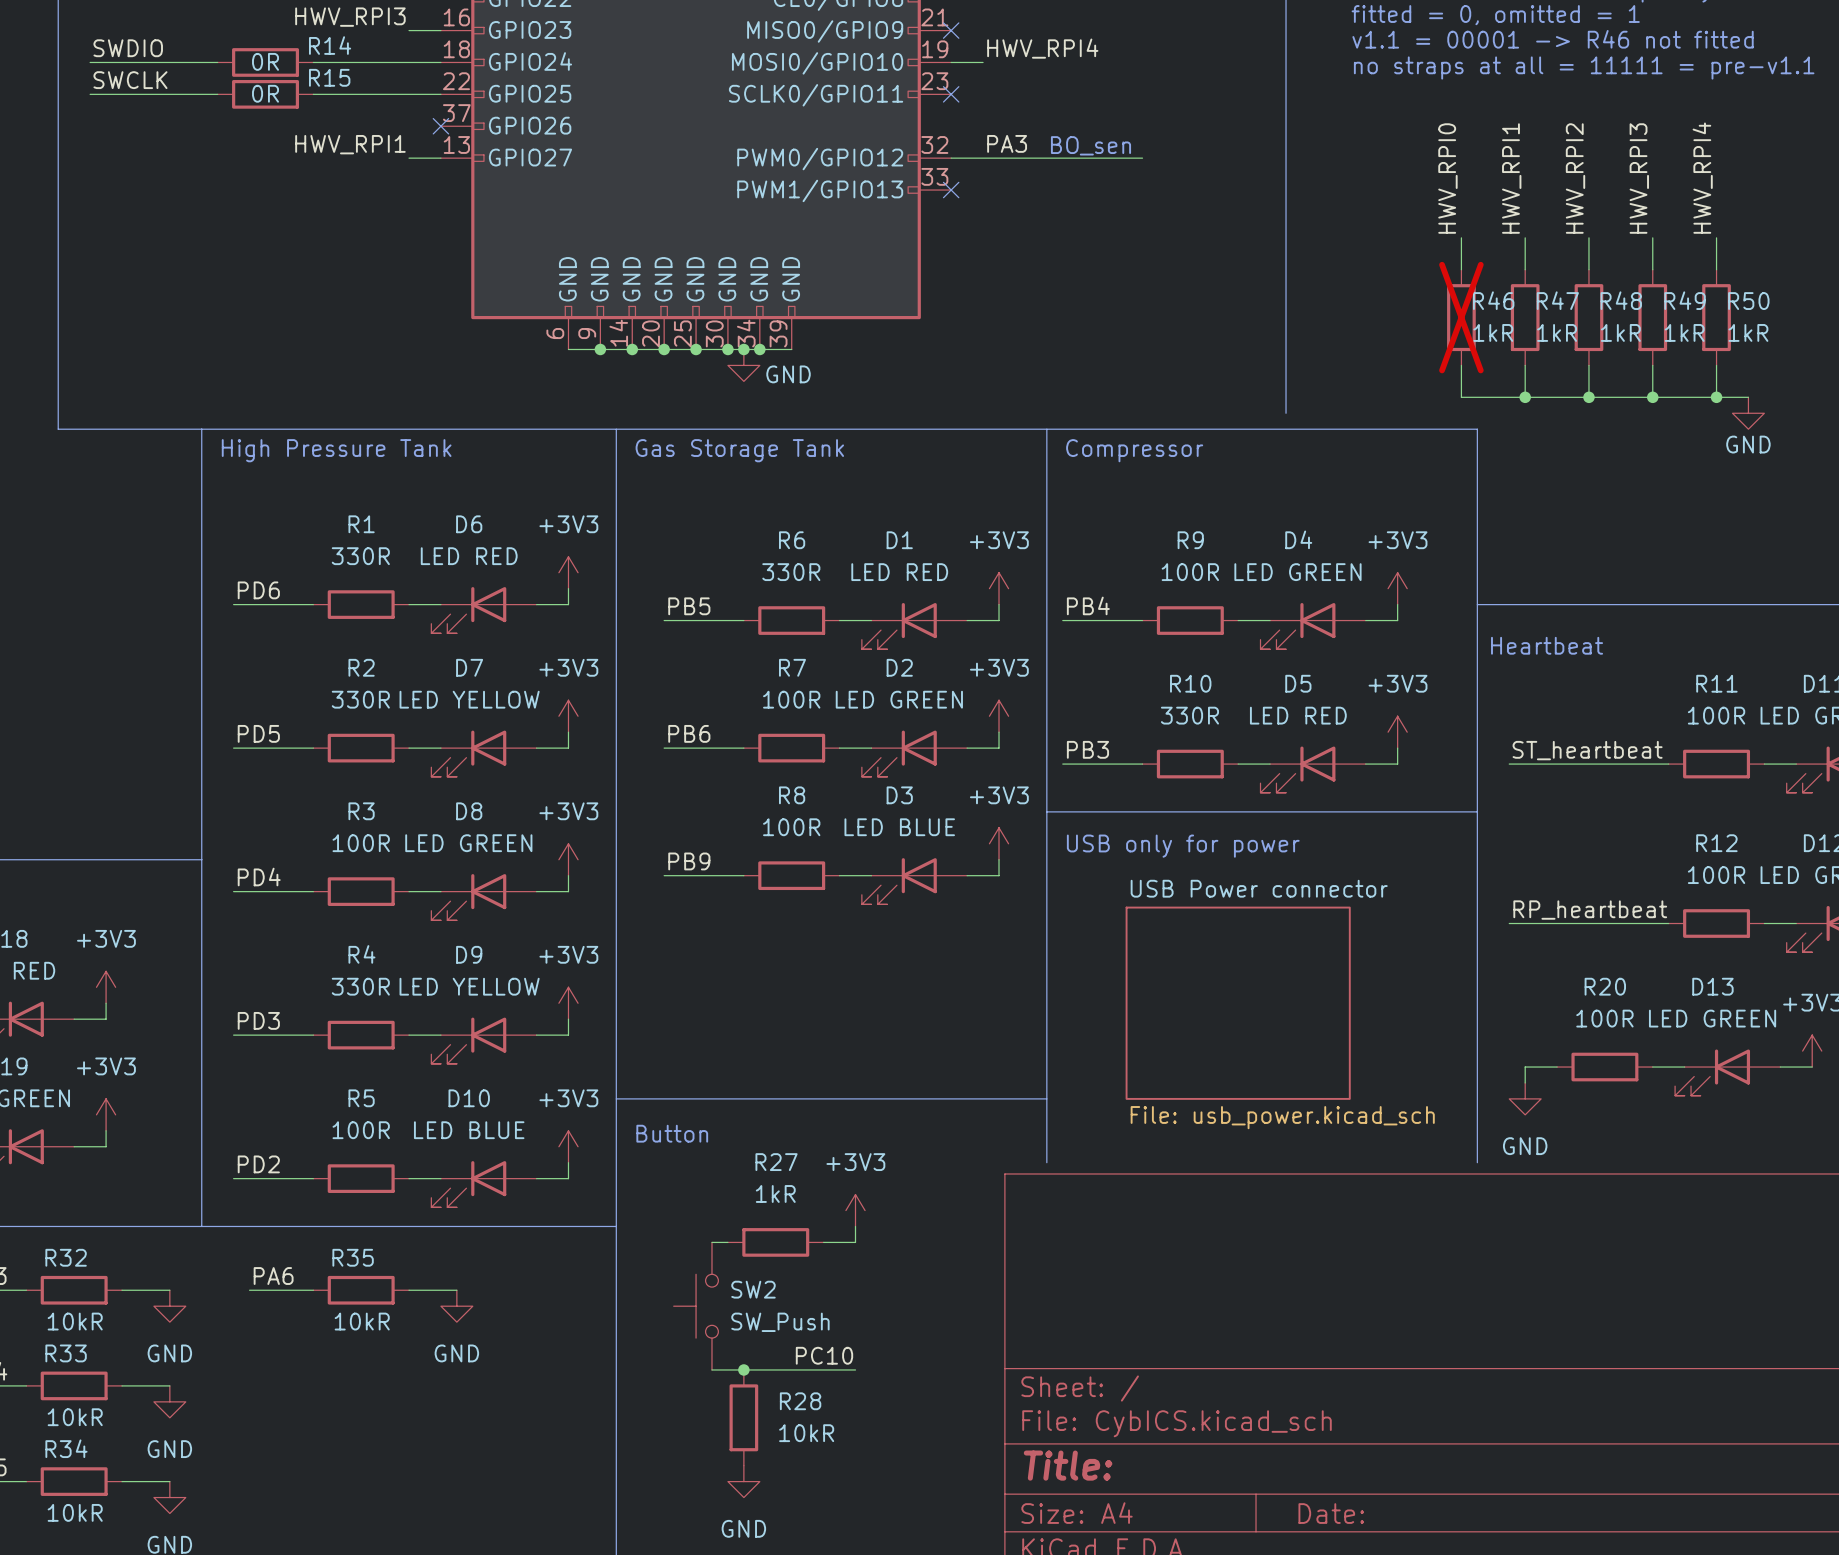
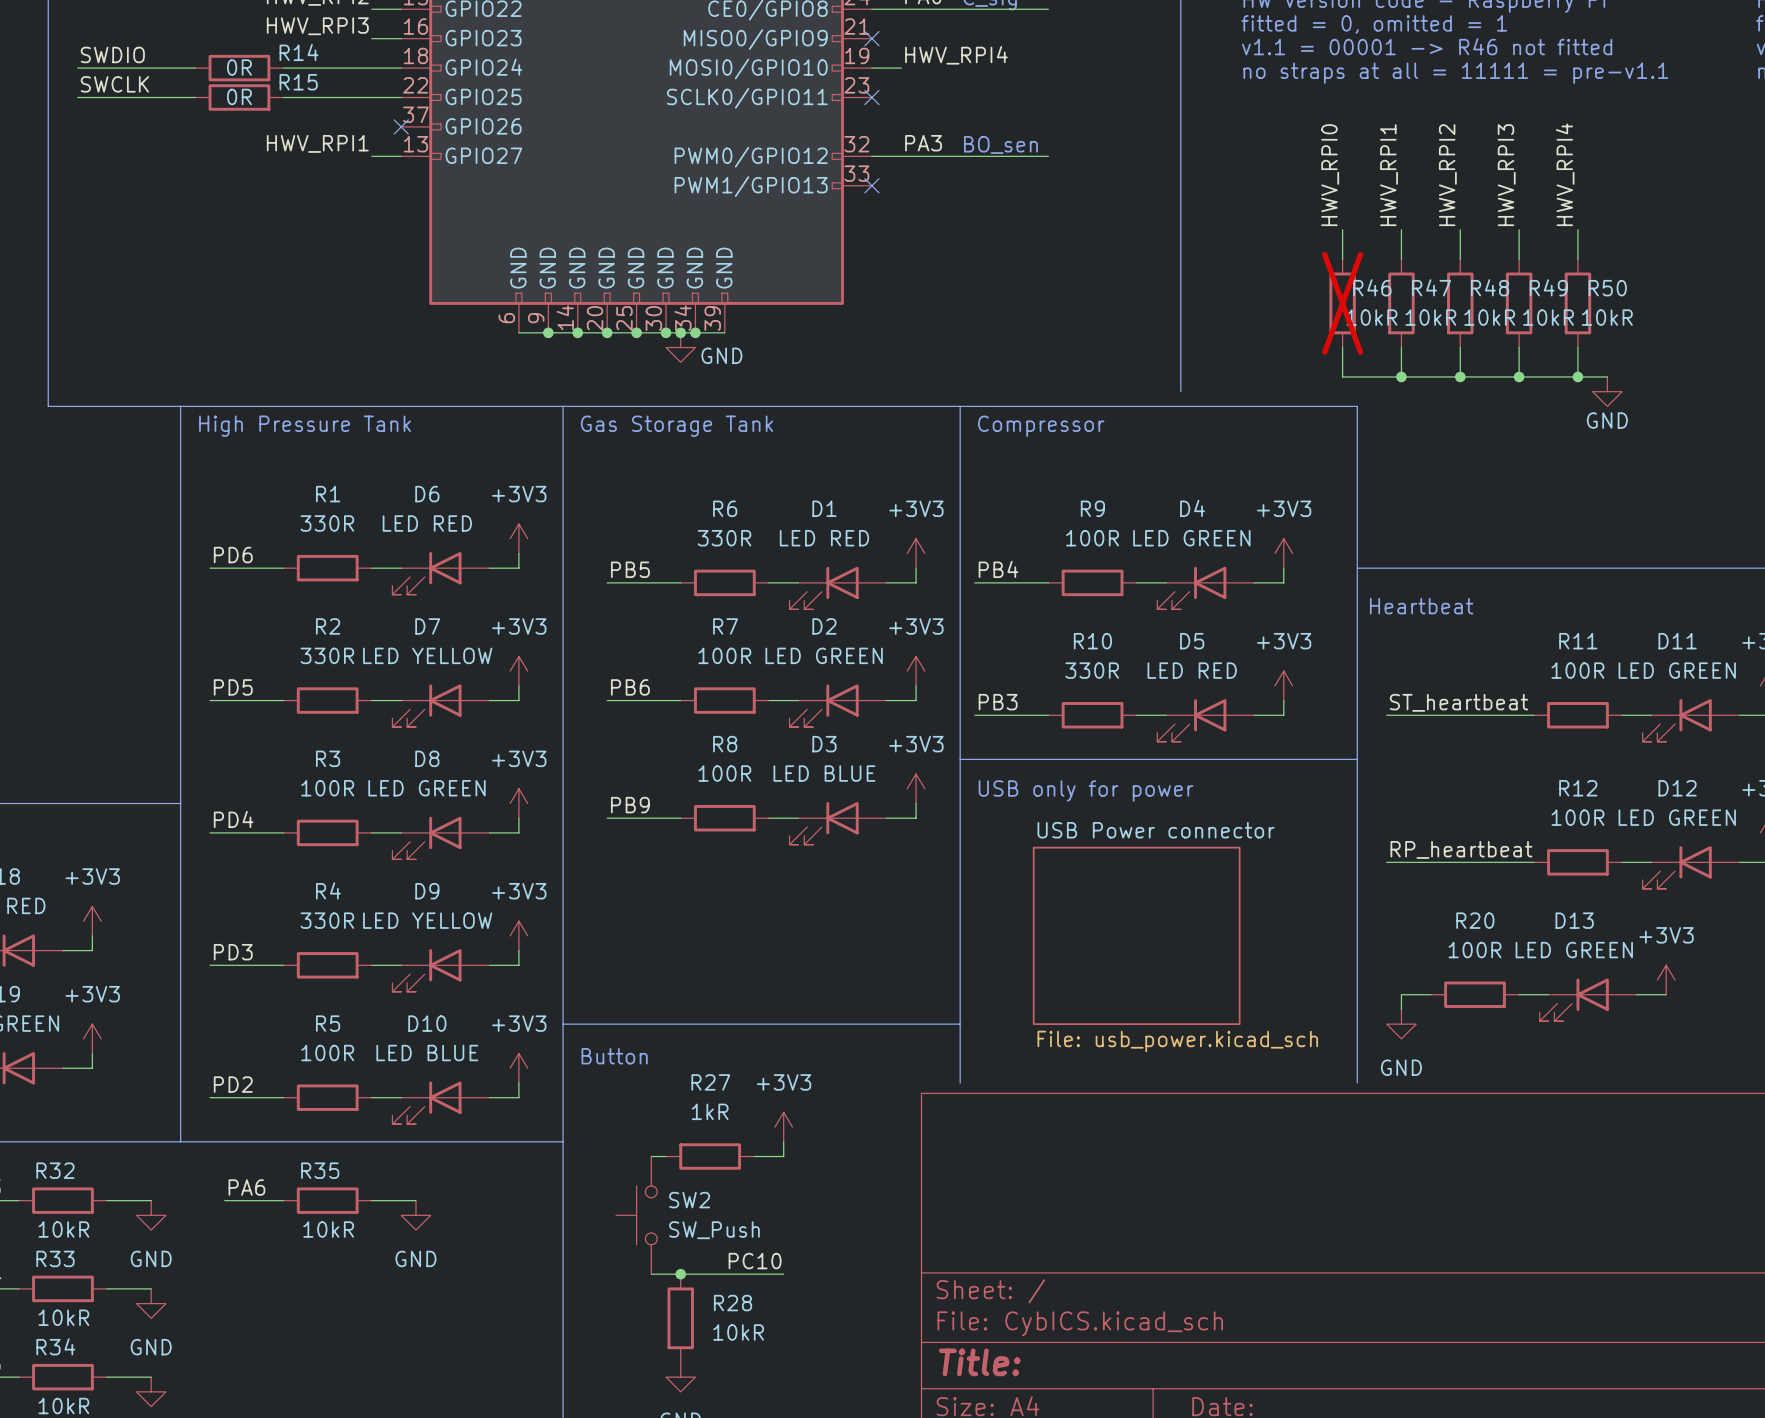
R46 value: 1kR (1493, 332) -> 10kR (1372, 317)
R47 value: 1kR (1557, 332) -> 10kR (1430, 317)
R48 value: 1kR (1620, 332) -> 10kR (1489, 317)
R49 value: 1kR (1684, 332) -> 10kR (1548, 317)
R50 value: 1kR (1748, 332) -> 10kR (1607, 317)

